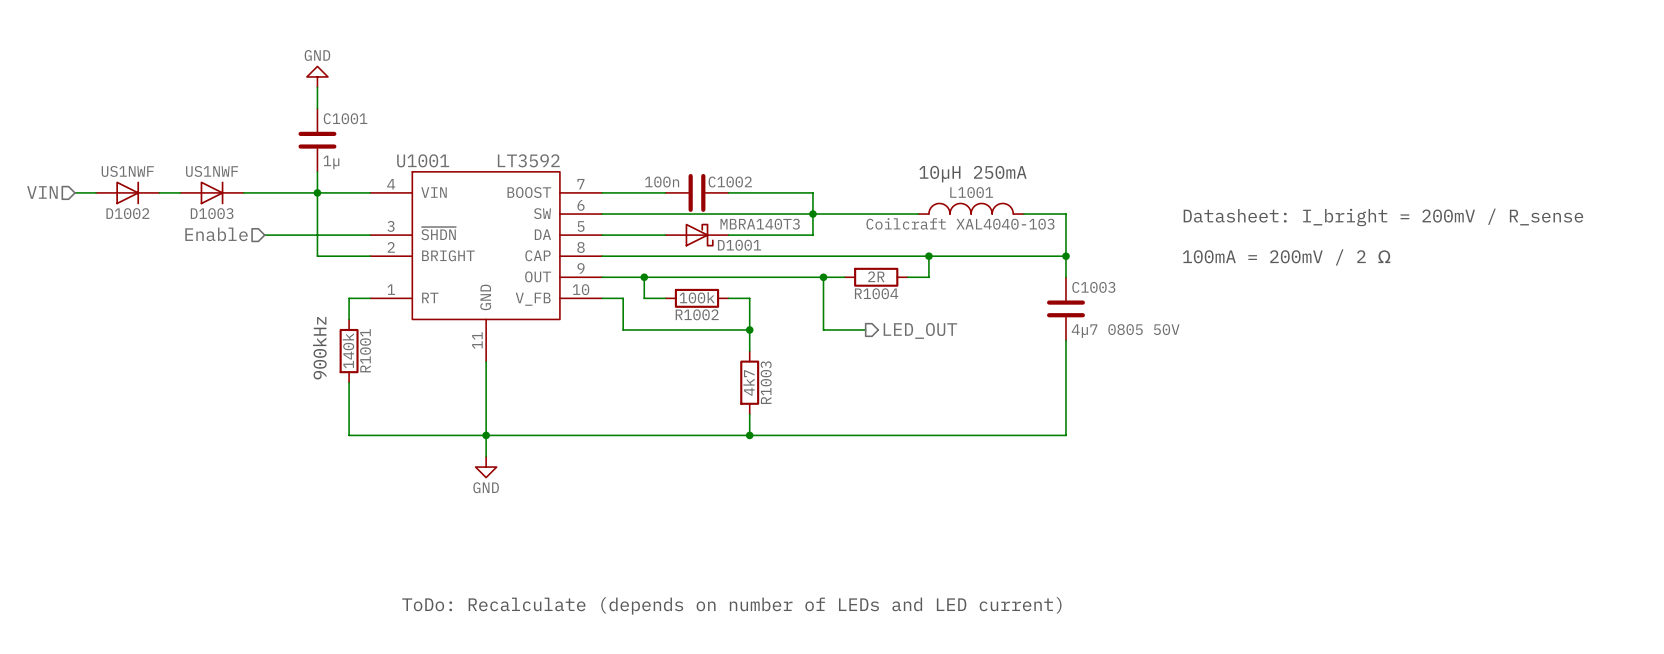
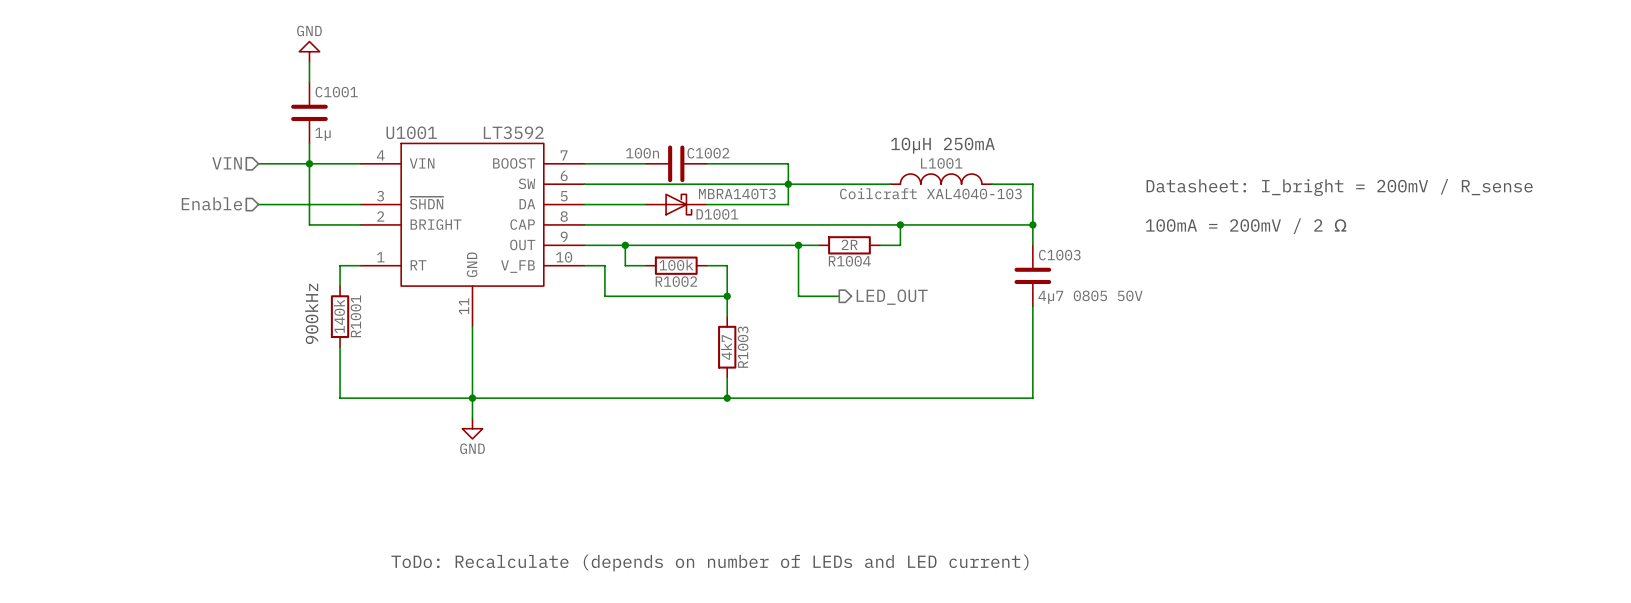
hierarchical label position: VIN (42, 192) -> VIN (227, 163)
wire: (74, 192) (96, 192) -> none
D1002: US1NWF (127, 192) -> none
wire: (159, 192) (180, 192) -> none
D1003: US1NWF (212, 192) -> none
wire: (243, 192) (264, 192) -> none

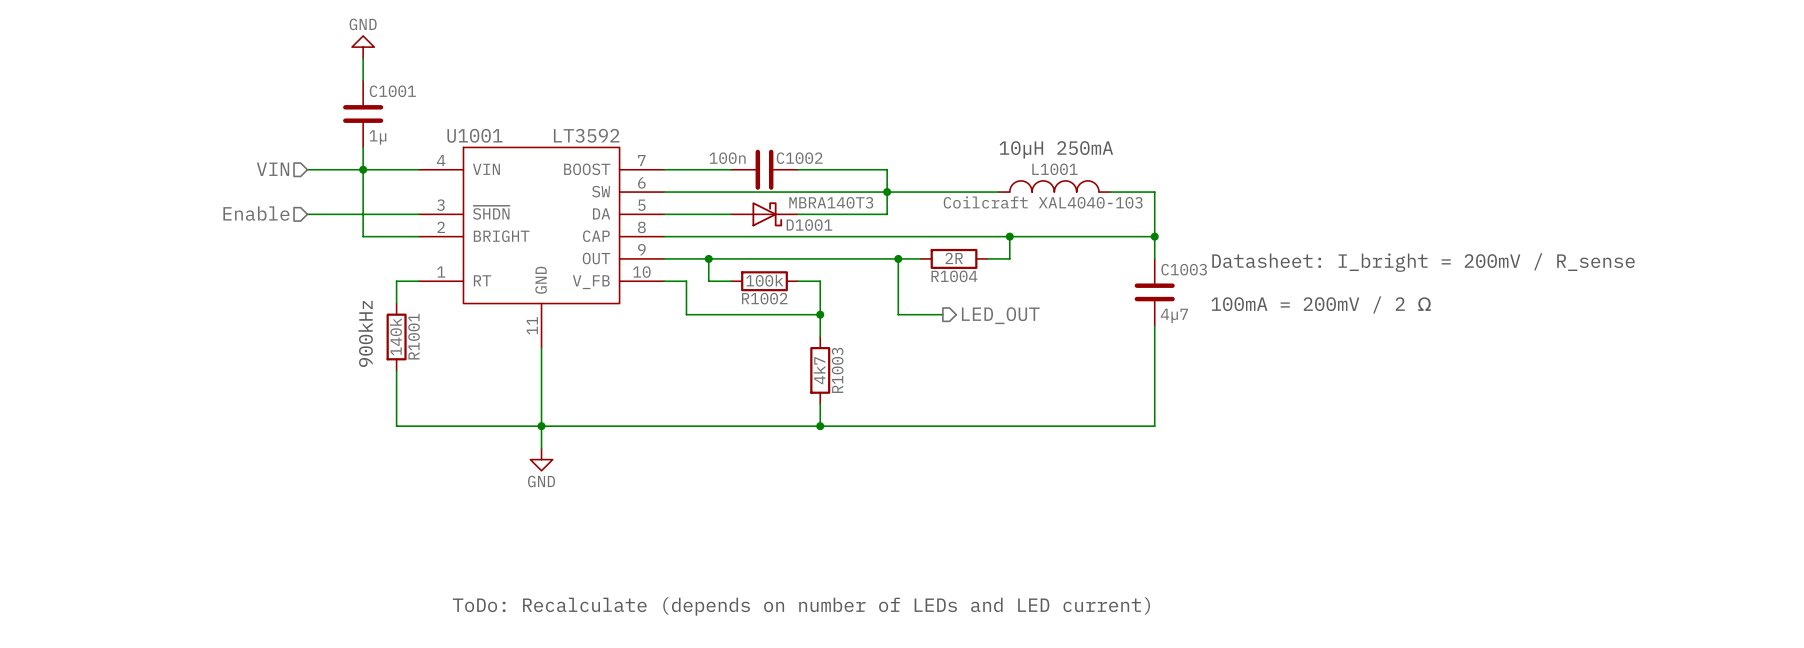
text position: Datasheet: I_bright = 200mV / R_sense (1339, 187) -> Datasheet: I_bright = 200mV / R_sense (1423, 262)
text position: 100mA = 200mV / 2 Ω (1246, 226) -> 100mA = 200mV / 2 Ω (1321, 304)
C1003 value: 4µ7 0805 50V (1090, 297) -> 4µ7 (1174, 315)

